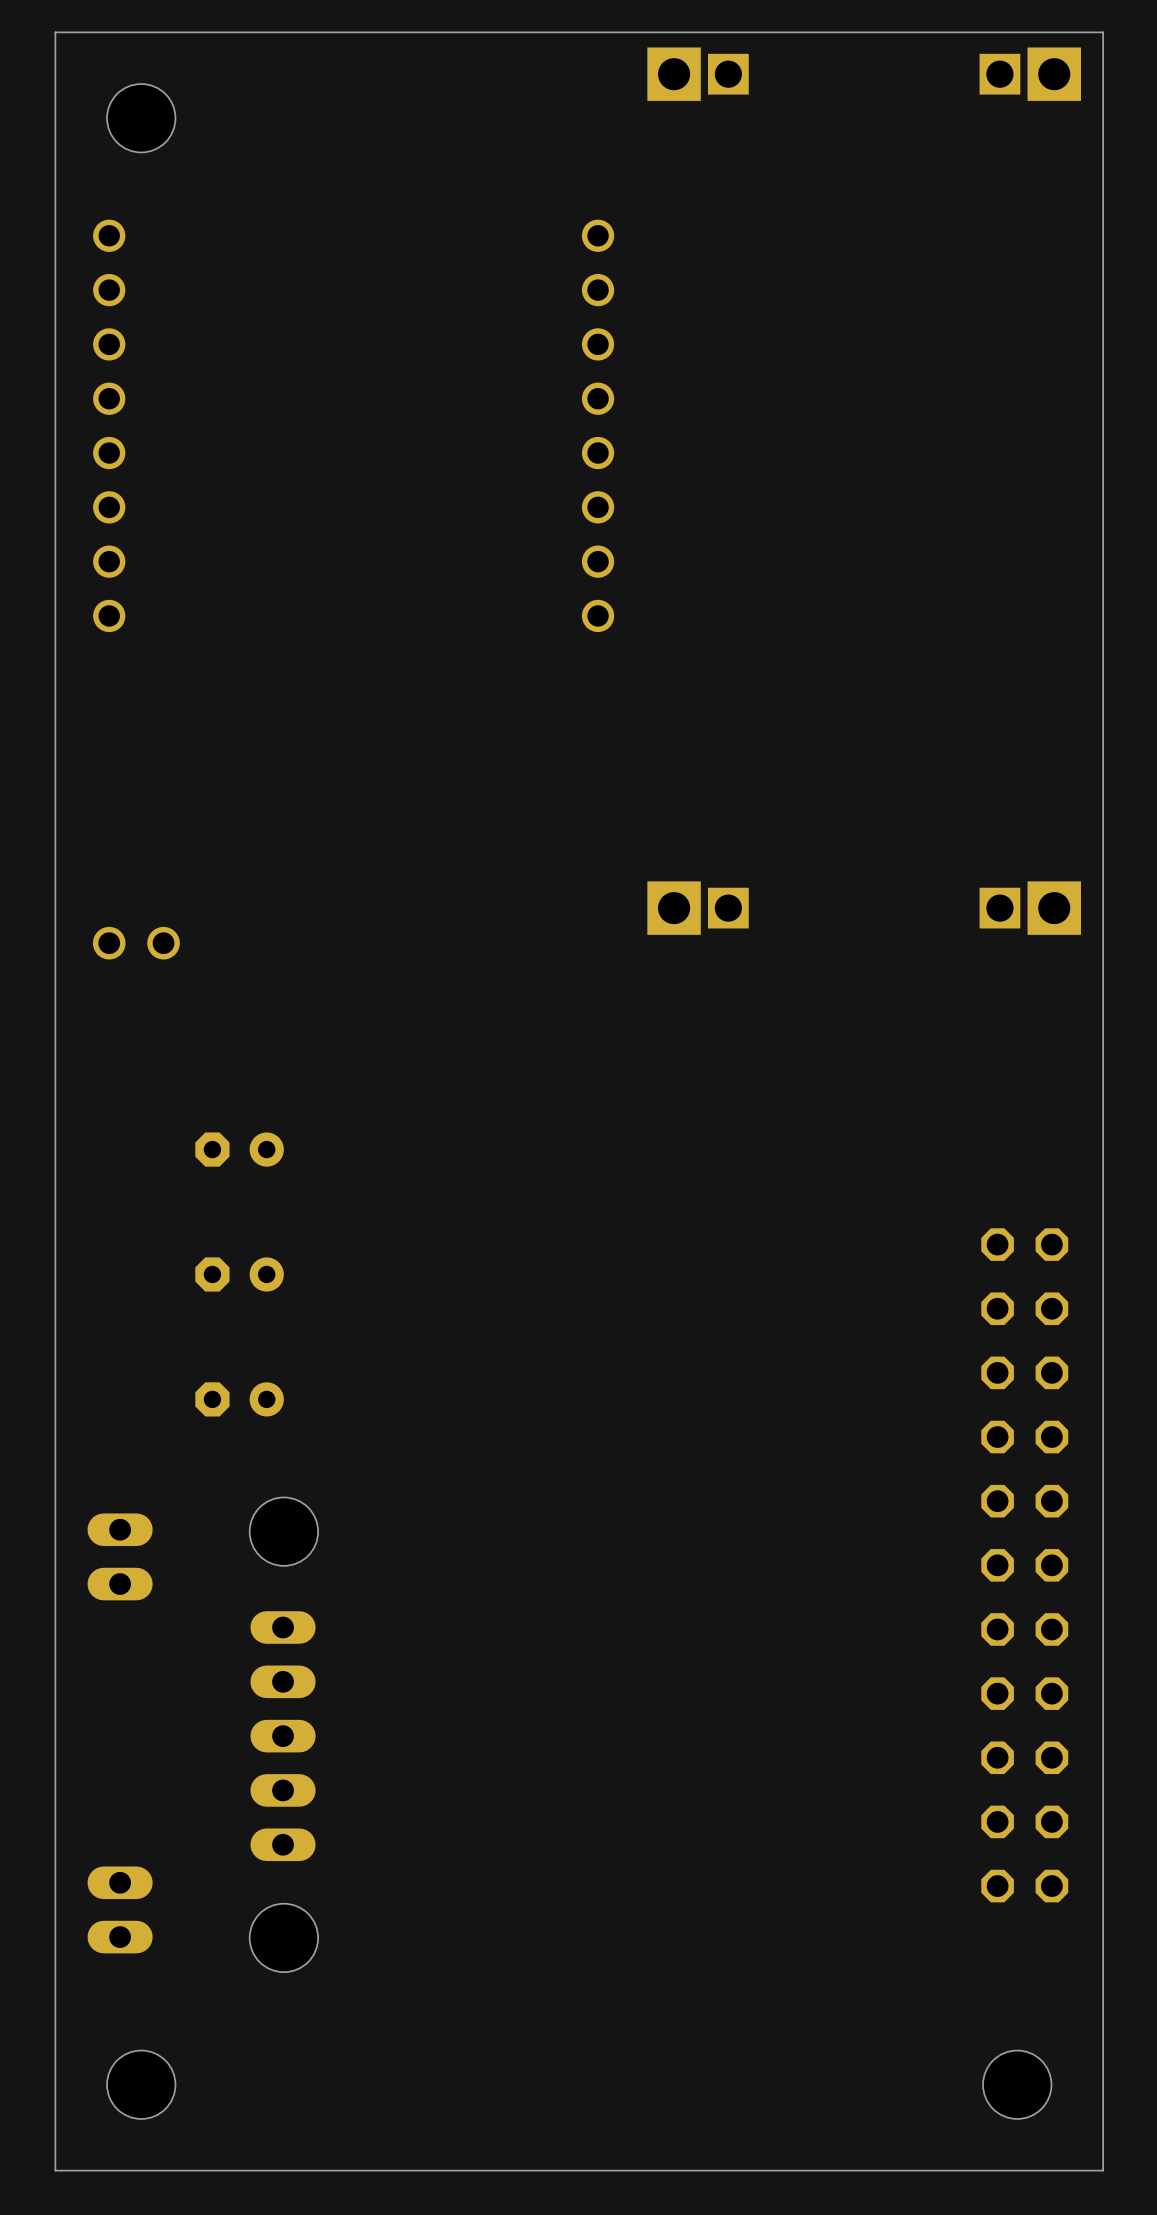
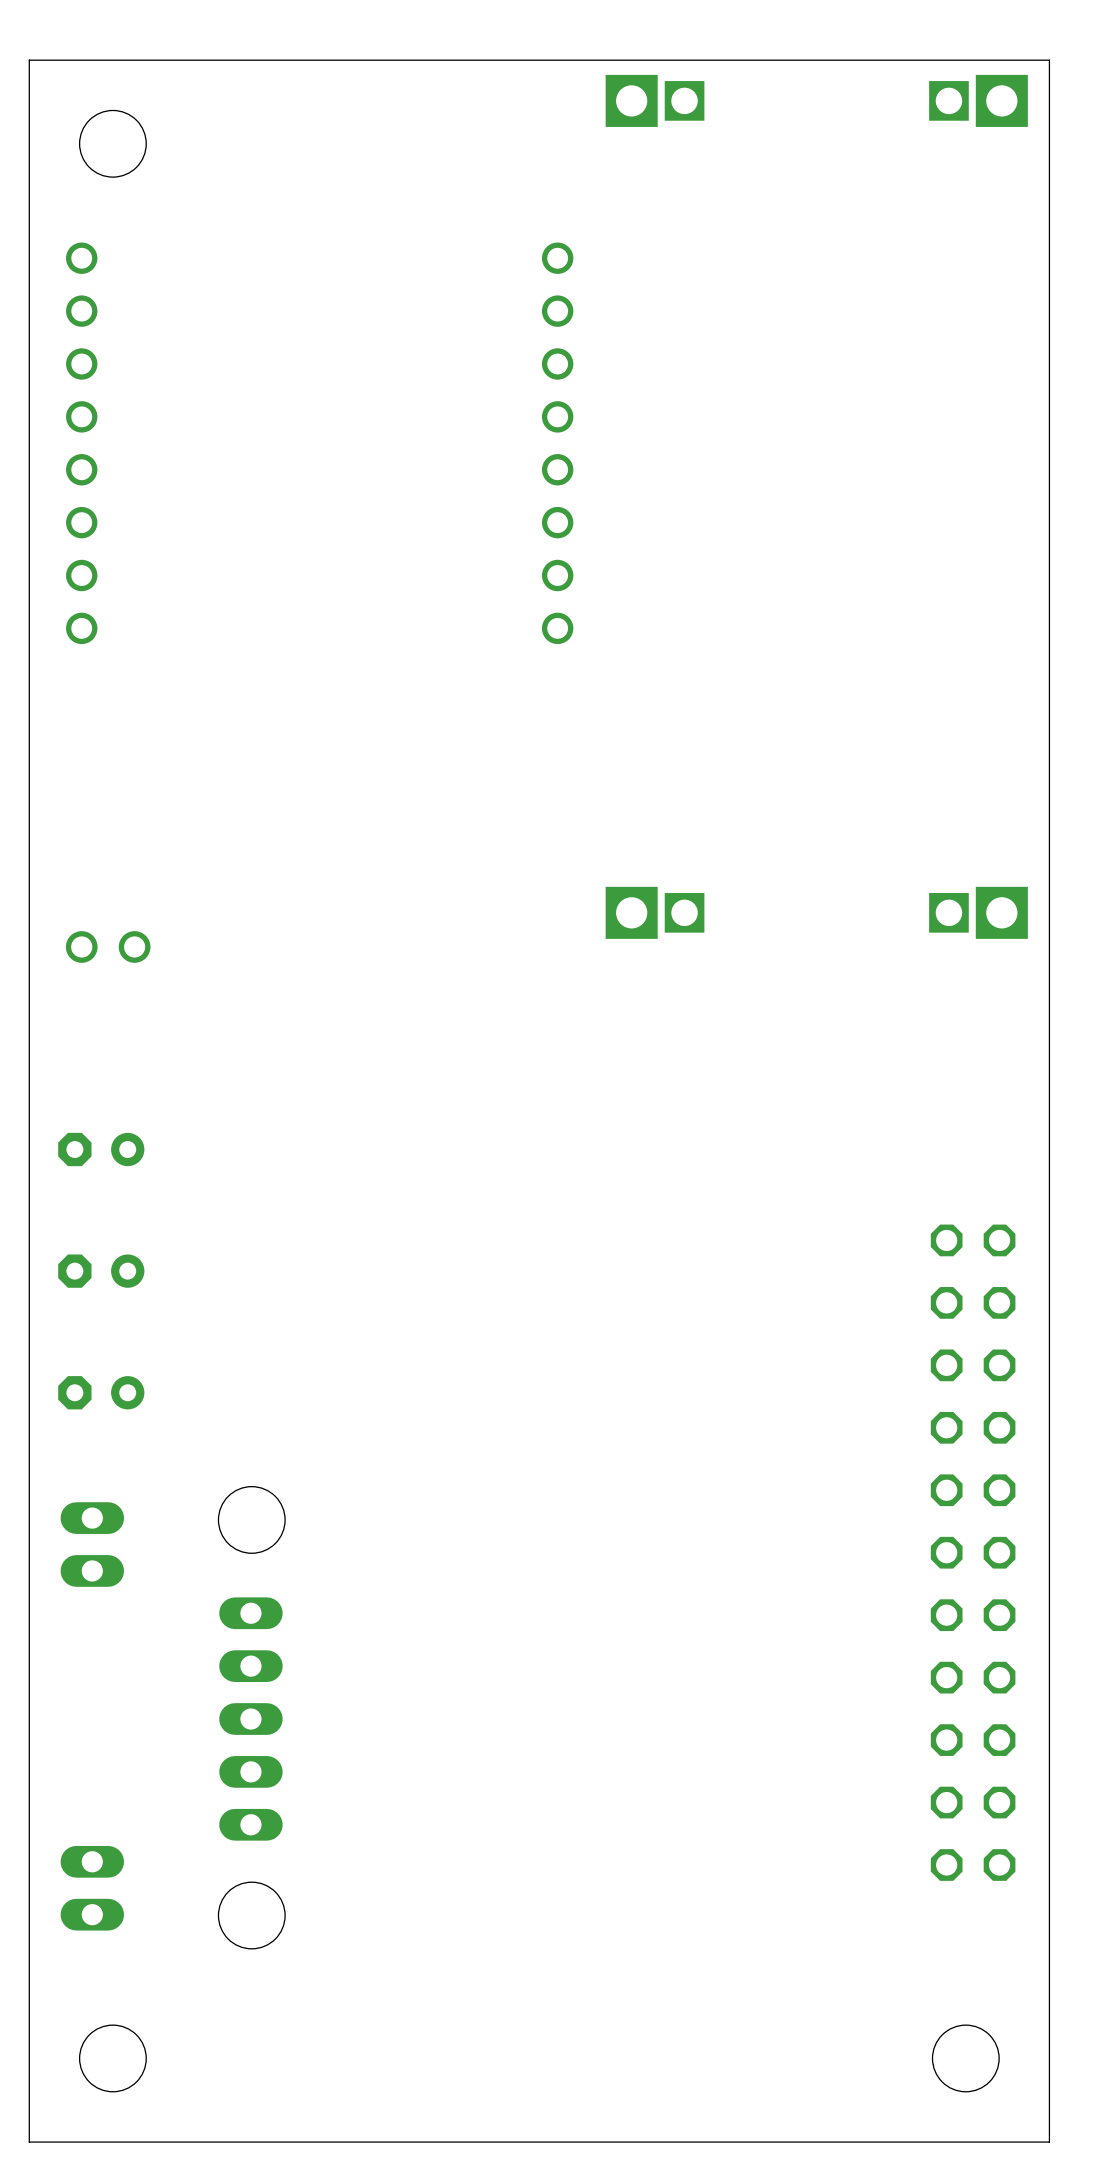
part: (239, 1149) -> none
part: none -> (101, 1149)
part: (239, 1274) -> none
part: none -> (101, 1271)
part: (239, 1399) -> none
part: none -> (101, 1392)

